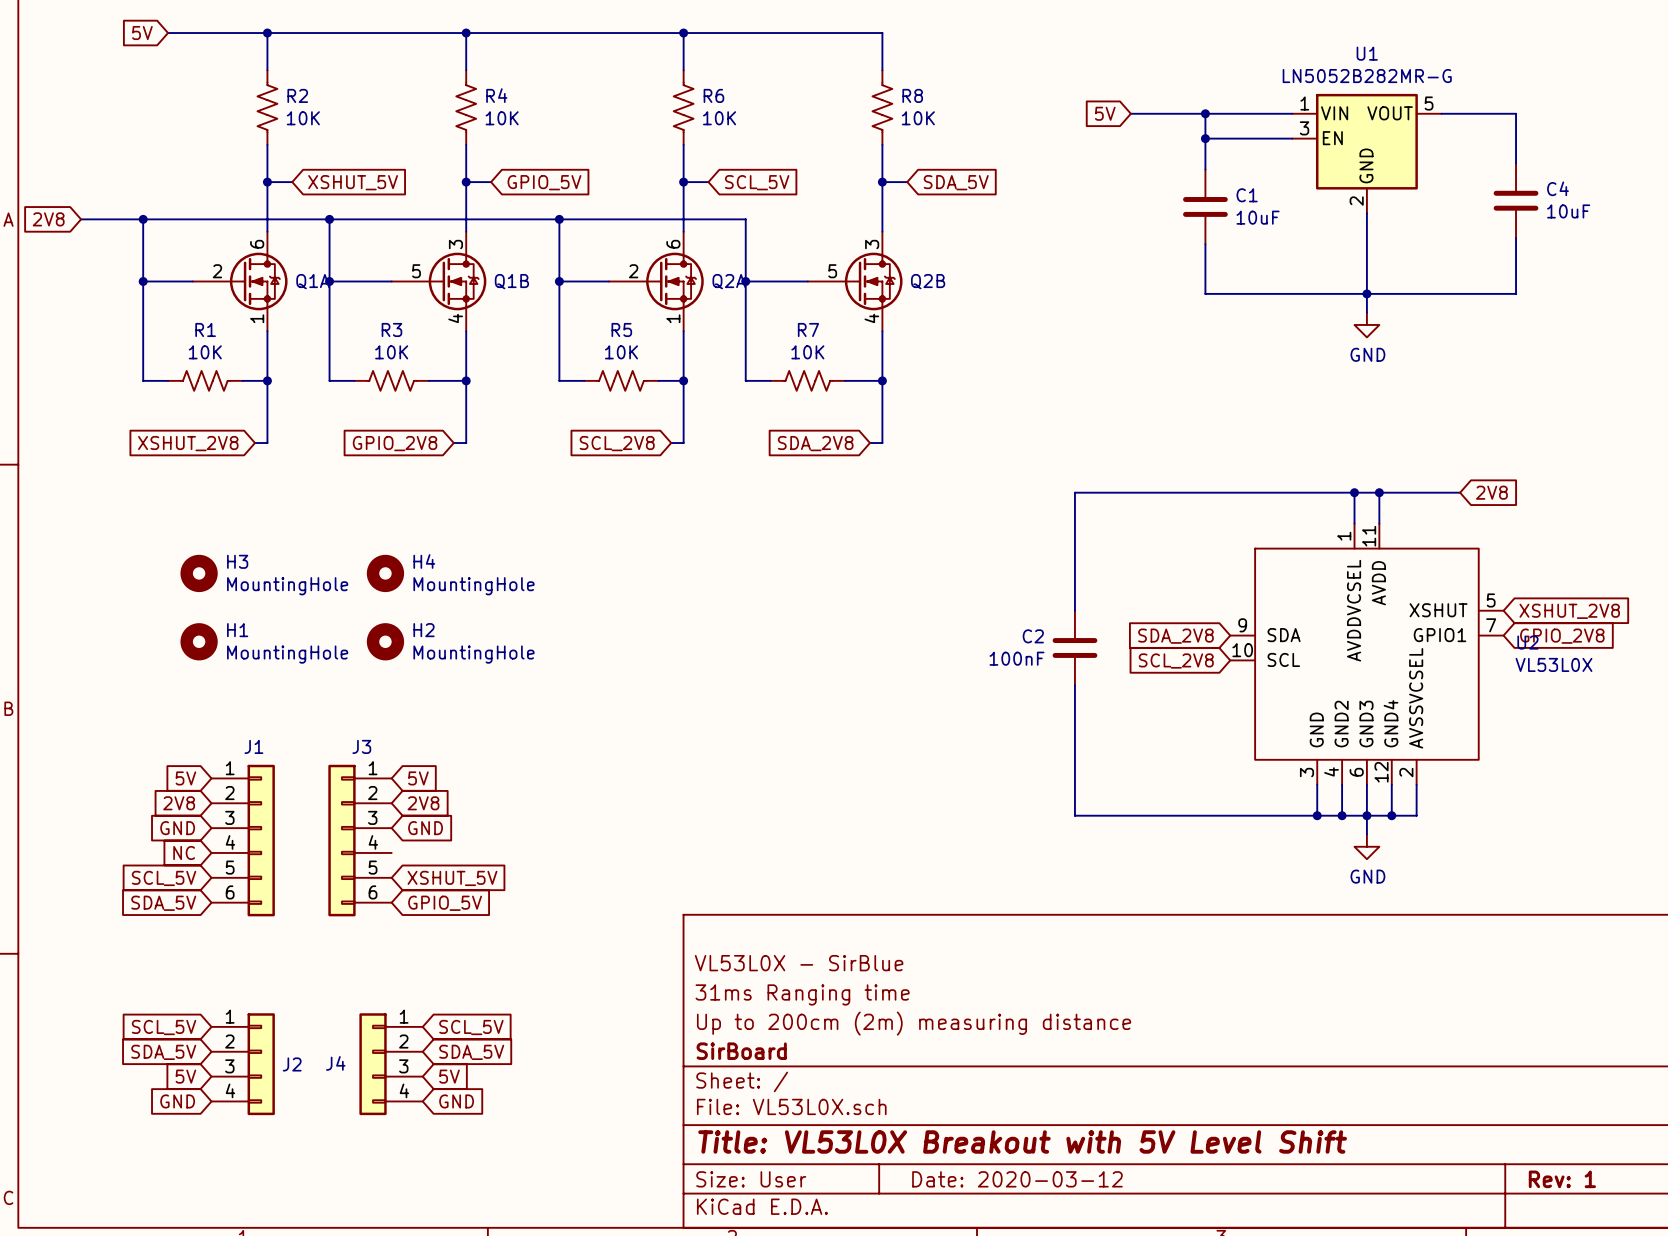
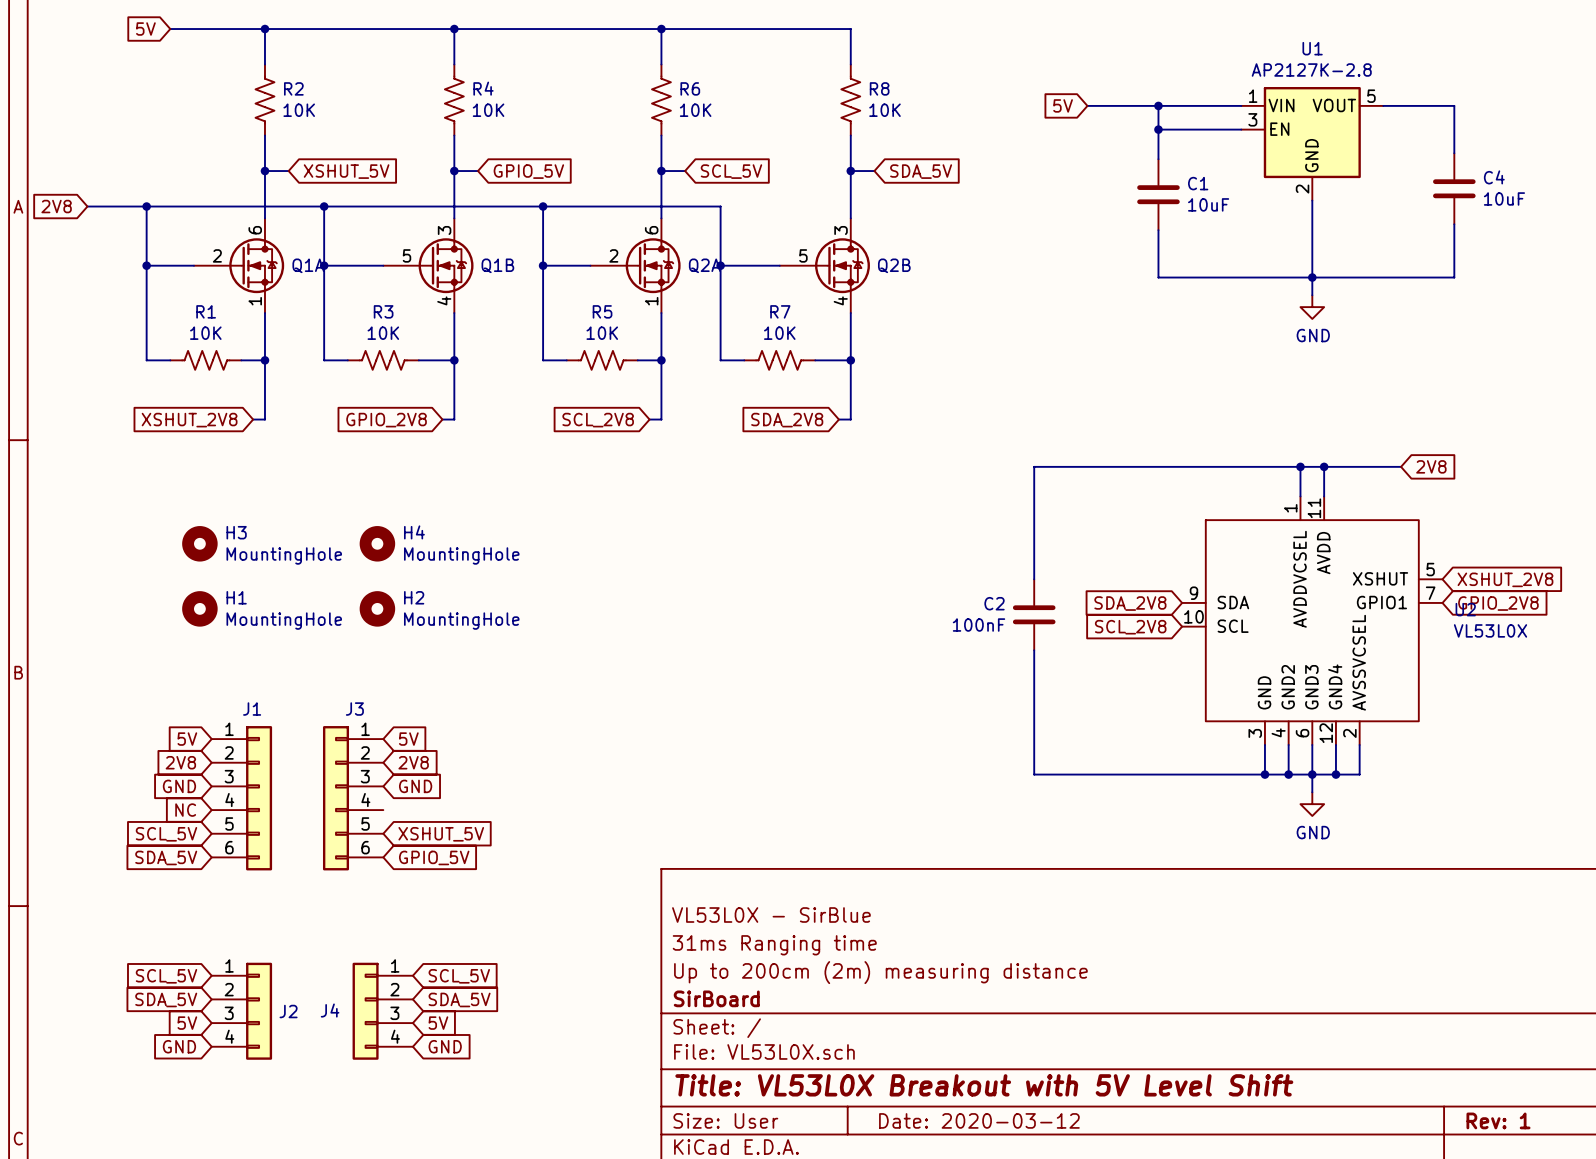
U1 value: LN5052B282MR-G (1367, 76) -> AP2127K-2.8 (1311, 69)

